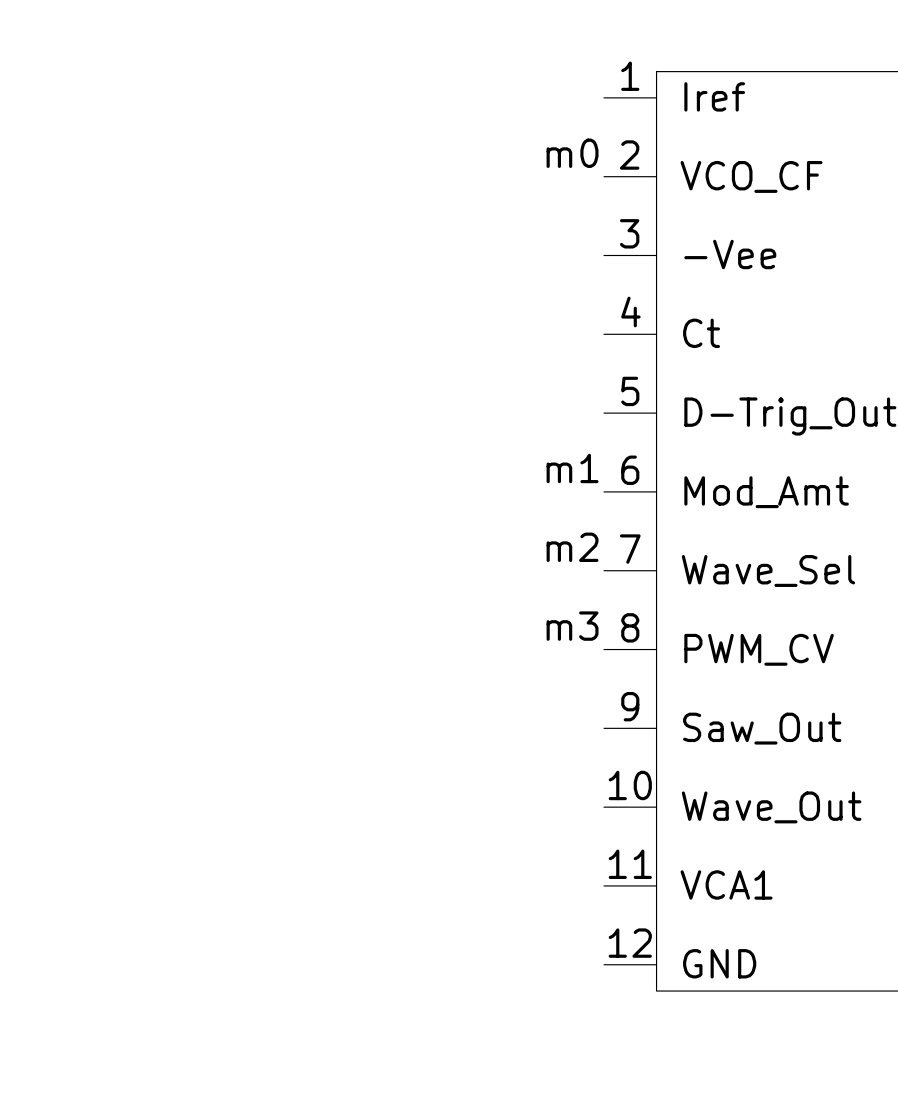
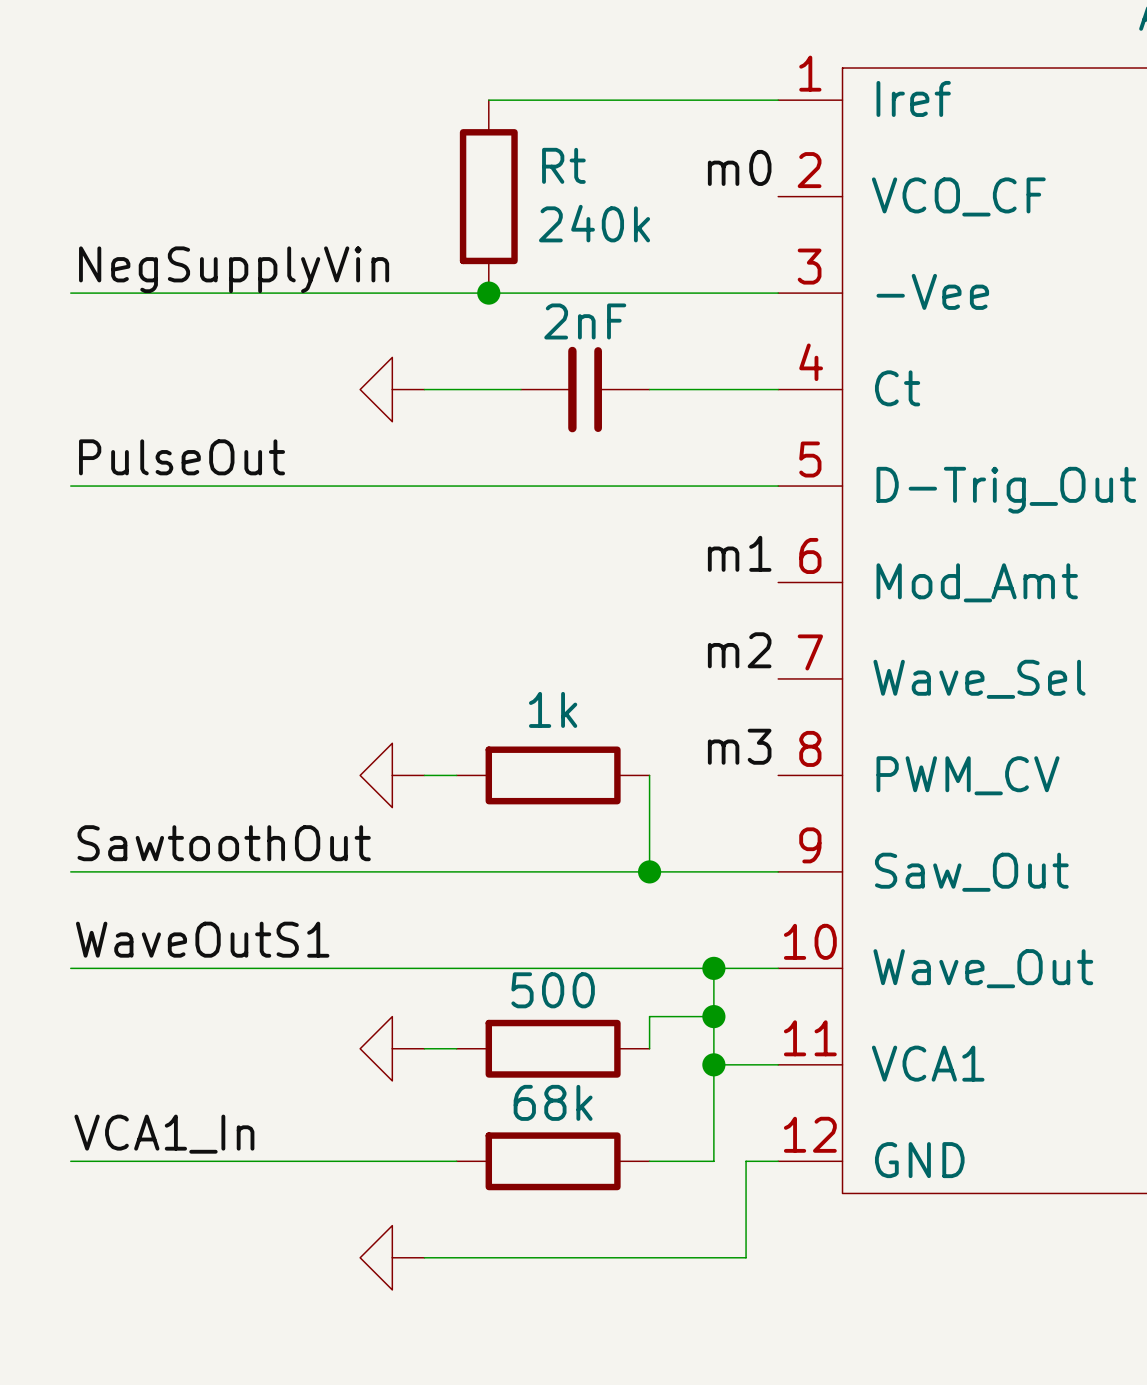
wire: none -> (488, 100) (778, 100)
Rt: none -> 240k (488, 196)
label: none -> NegSupplyVin (234, 269)
wire: none -> (70, 293) (778, 293)
junction: none -> (488, 293)
power symbol: none -> (392, 389)
wire: none -> (424, 389) (520, 389)
part: none -> 2nF (585, 389)
wire: none -> (649, 389) (778, 389)
label: none -> PulseOut (182, 457)
wire: none -> (70, 486) (778, 486)
power symbol: none -> (392, 775)
wire: none -> (424, 775) (456, 775)
part: none -> 1k (553, 775)
wire: none -> (649, 775) (649, 871)
label: none -> SawtoothOut (224, 843)
wire: none -> (70, 871) (778, 871)
junction: none -> (649, 871)
label: none -> WaveOutS1 (202, 939)
wire: none -> (70, 968) (778, 968)
wire: none -> (713, 968) (713, 1161) (649, 1161)
junction: none -> (713, 968)
wire: none -> (713, 1016) (649, 1016) (649, 1048)
junction: none -> (713, 1016)
power symbol: none -> (392, 1048)
wire: none -> (424, 1048) (456, 1048)
part: none -> 500 (553, 1048)
wire: none -> (713, 1064) (778, 1064)
junction: none -> (713, 1064)
label: none -> VCA1_In (164, 1134)
wire: none -> (70, 1161) (456, 1161)
part: none -> 68k (553, 1161)
wire: none -> (778, 1161) (746, 1161) (746, 1257) (424, 1257)
power symbol: none -> (392, 1257)

